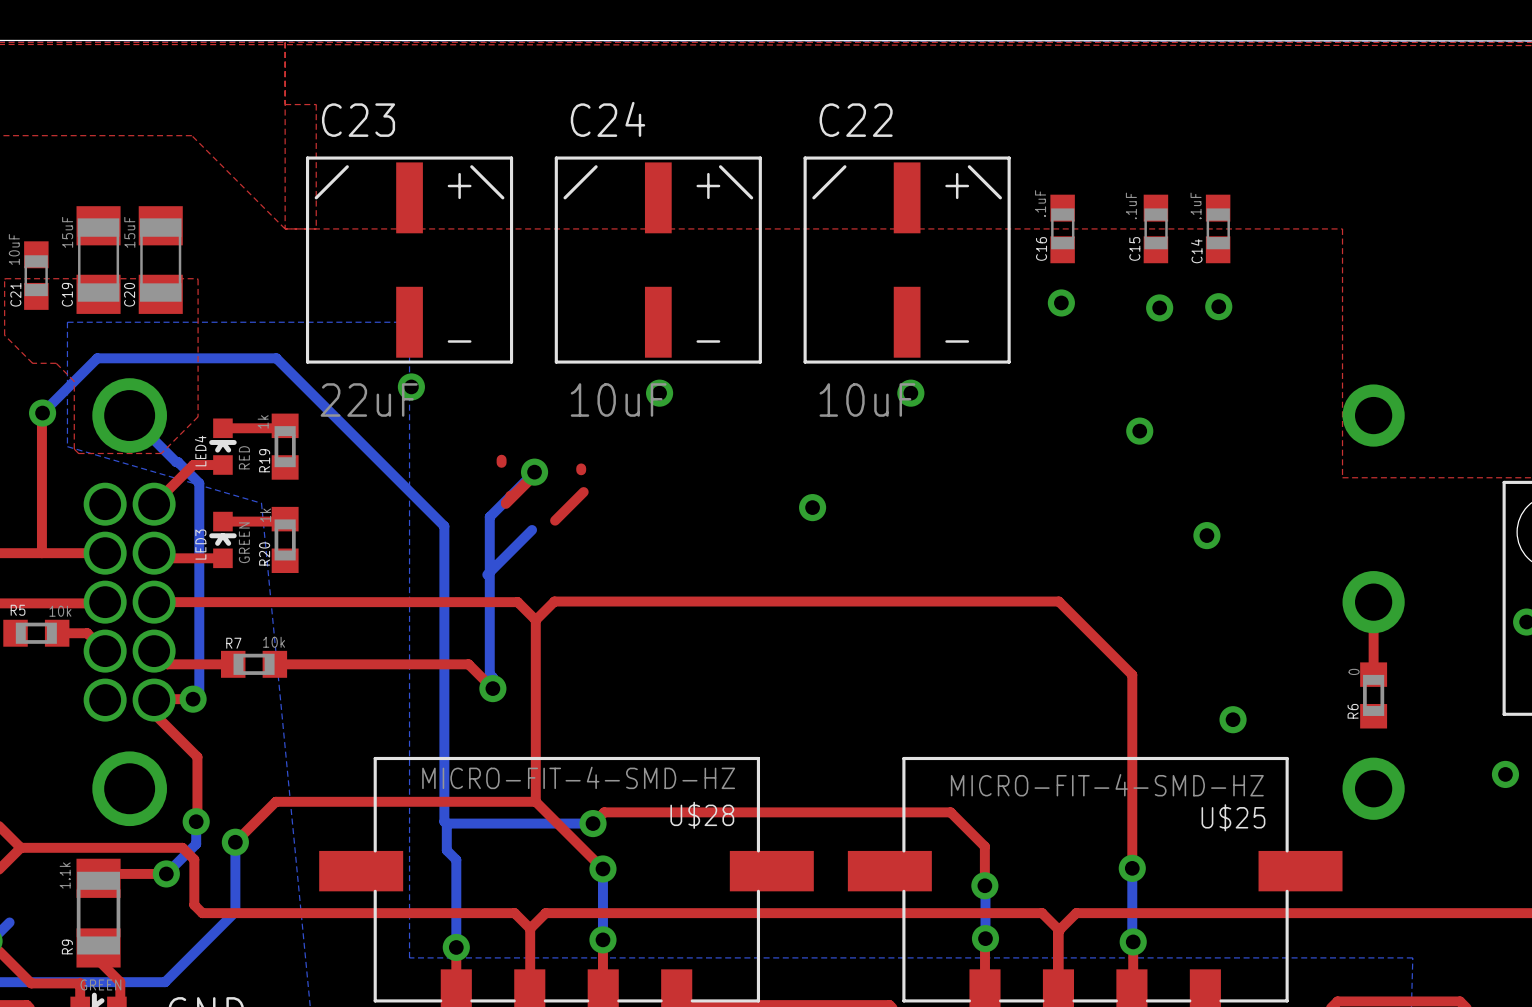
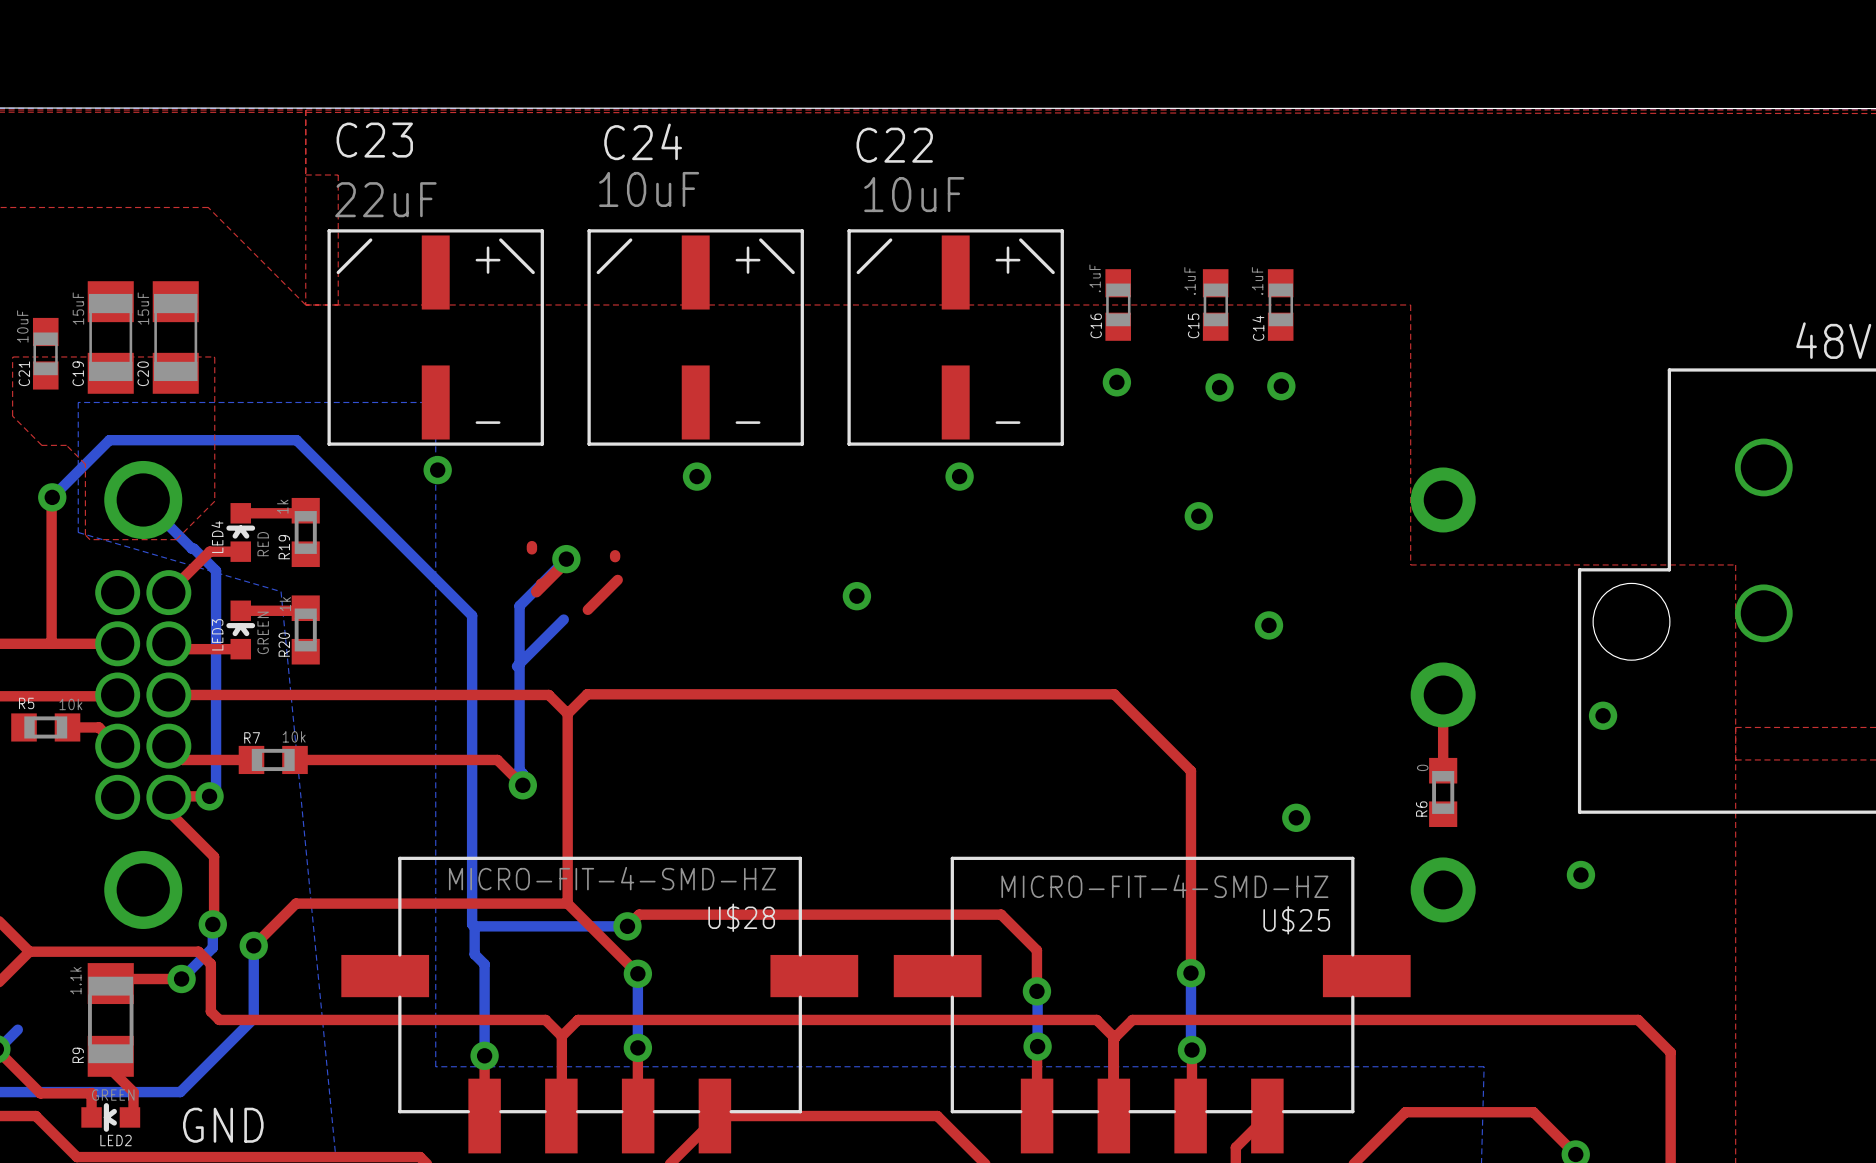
C24 name position: C24 (607, 119) -> C24 (643, 141)
C23 name position: C23 (358, 120) -> C23 (374, 140)
C22 name position: C22 (856, 120) -> C22 (894, 145)
C23 value position: 22uF (369, 399) -> 22uF (385, 199)
C24 value position: 10uF (618, 399) -> 10uF (649, 189)
C22 value position: 10uF (867, 399) -> 10uF (914, 194)

